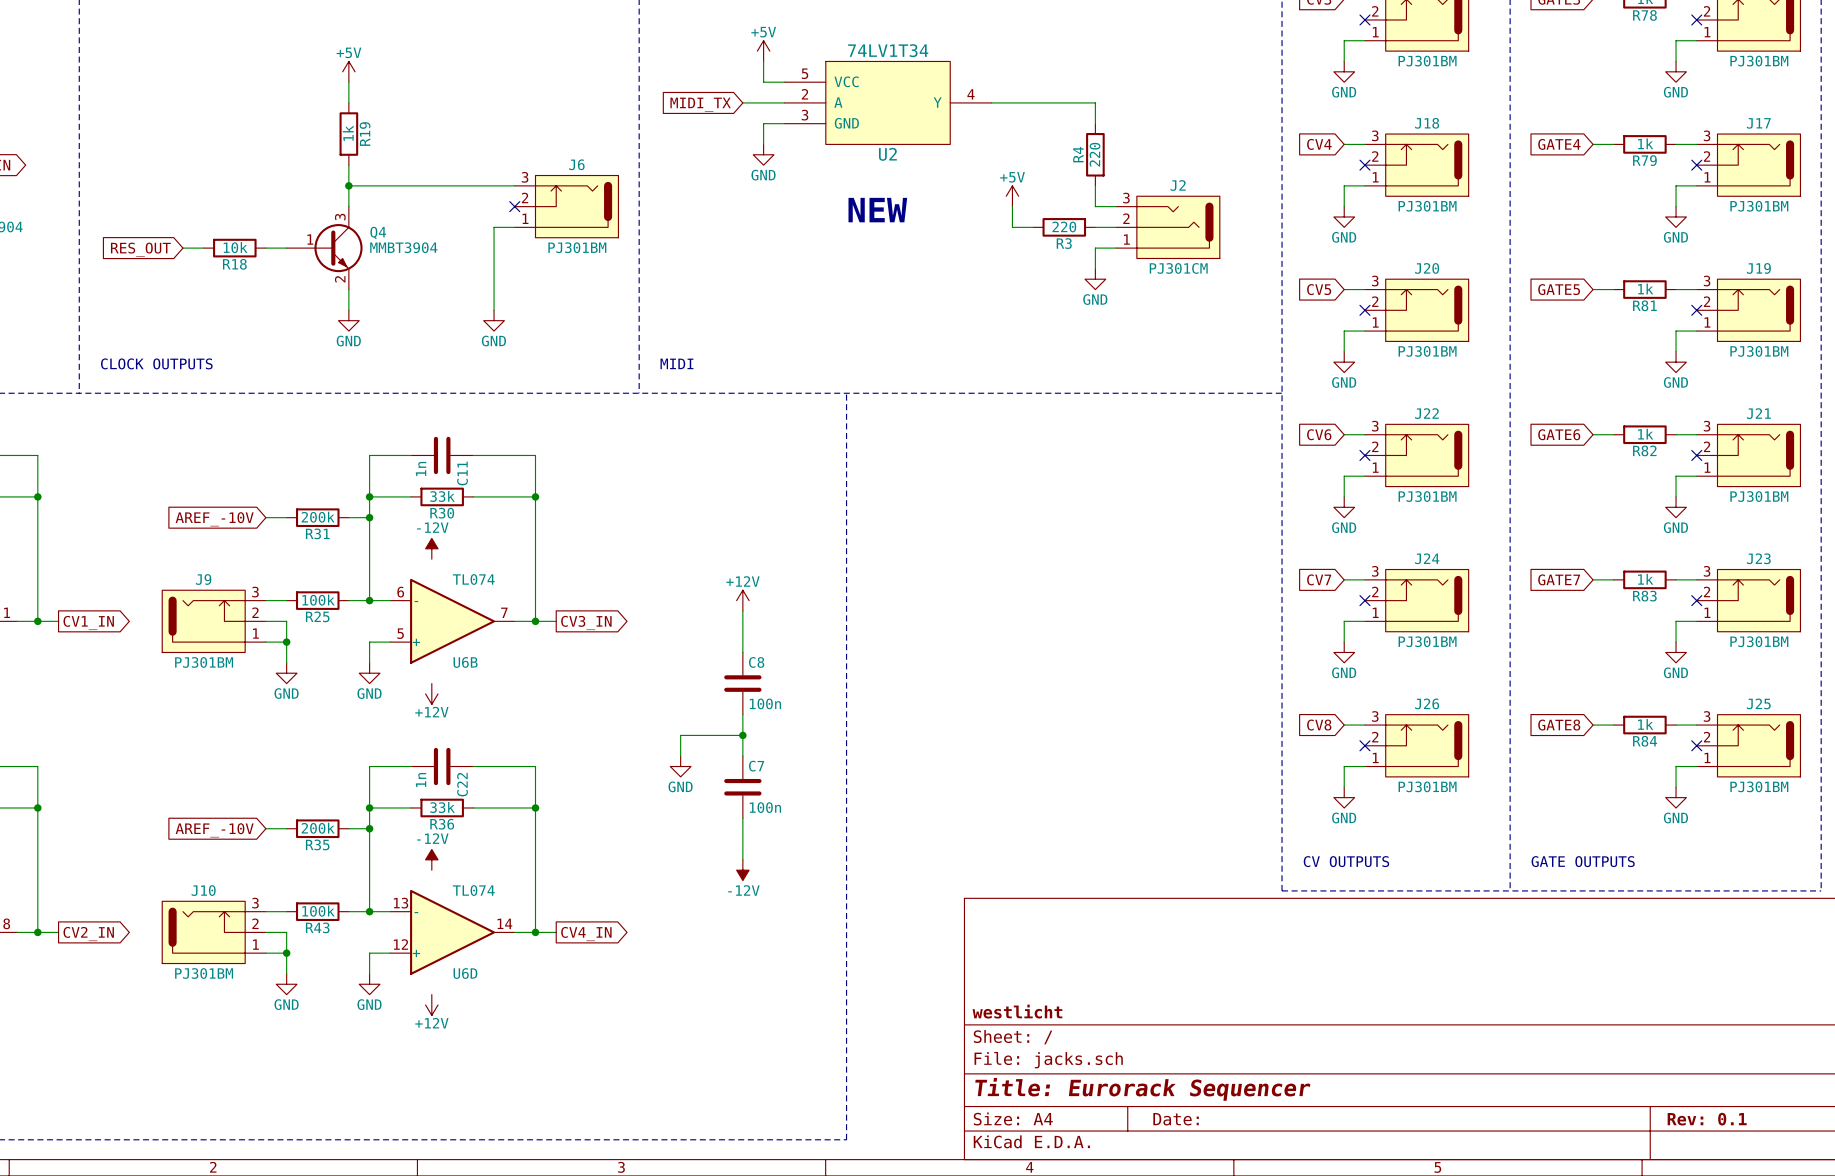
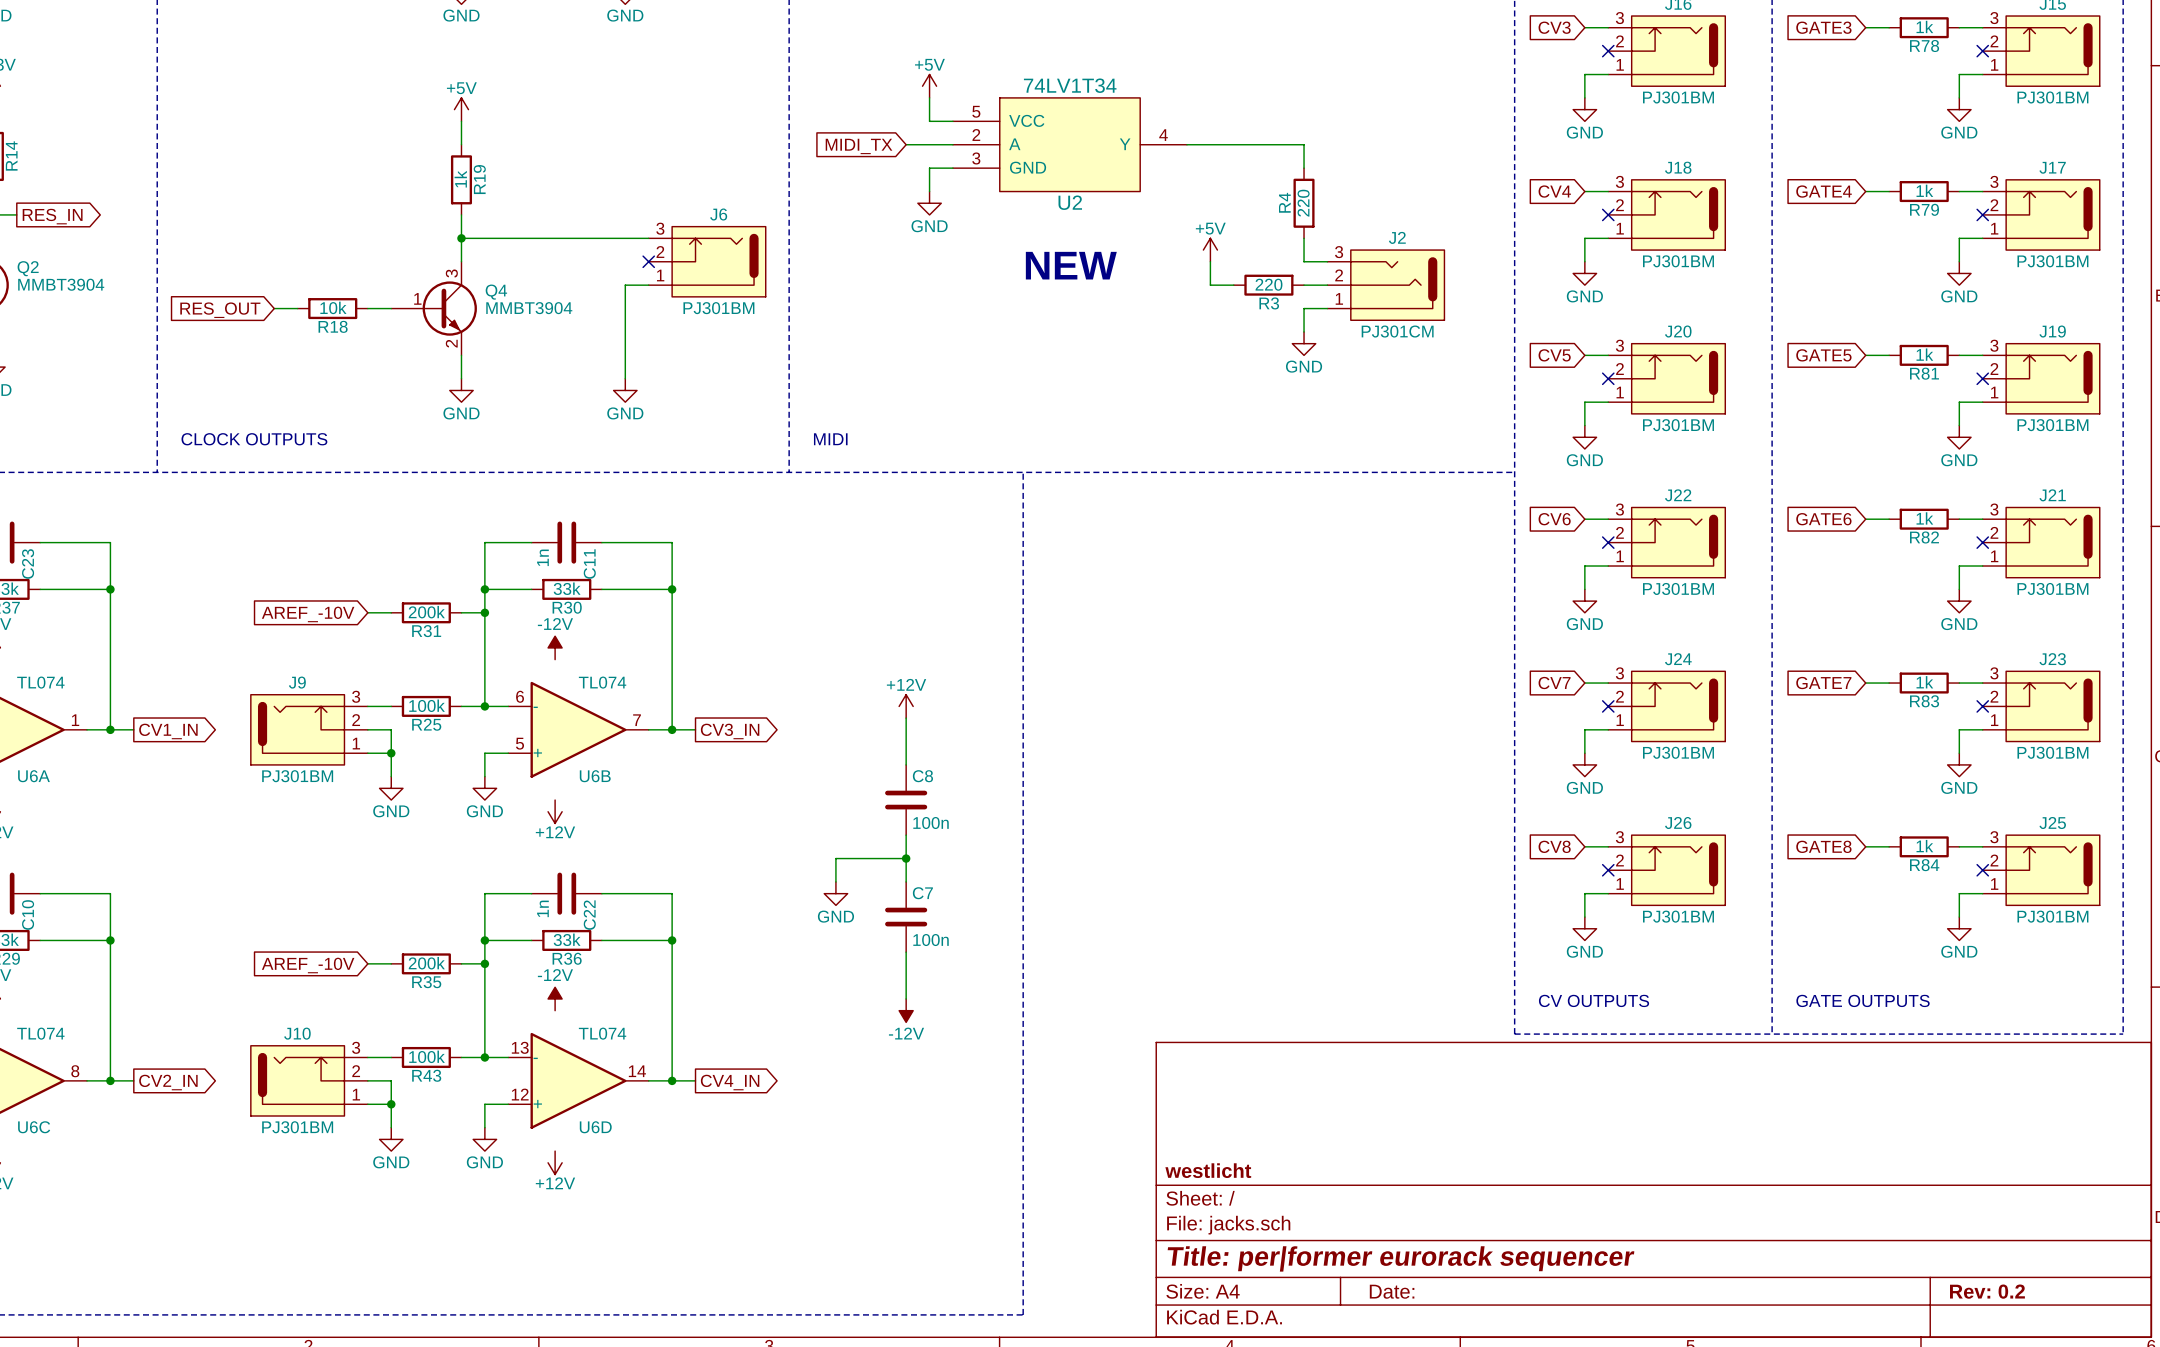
title block: Title: Eurorack Sequencer (1142, 1089) -> Title: per|former eurorack sequencer (1401, 1258)
title block: Rev: 0.1 (1707, 1119) -> Rev: 0.2 (1987, 1291)

